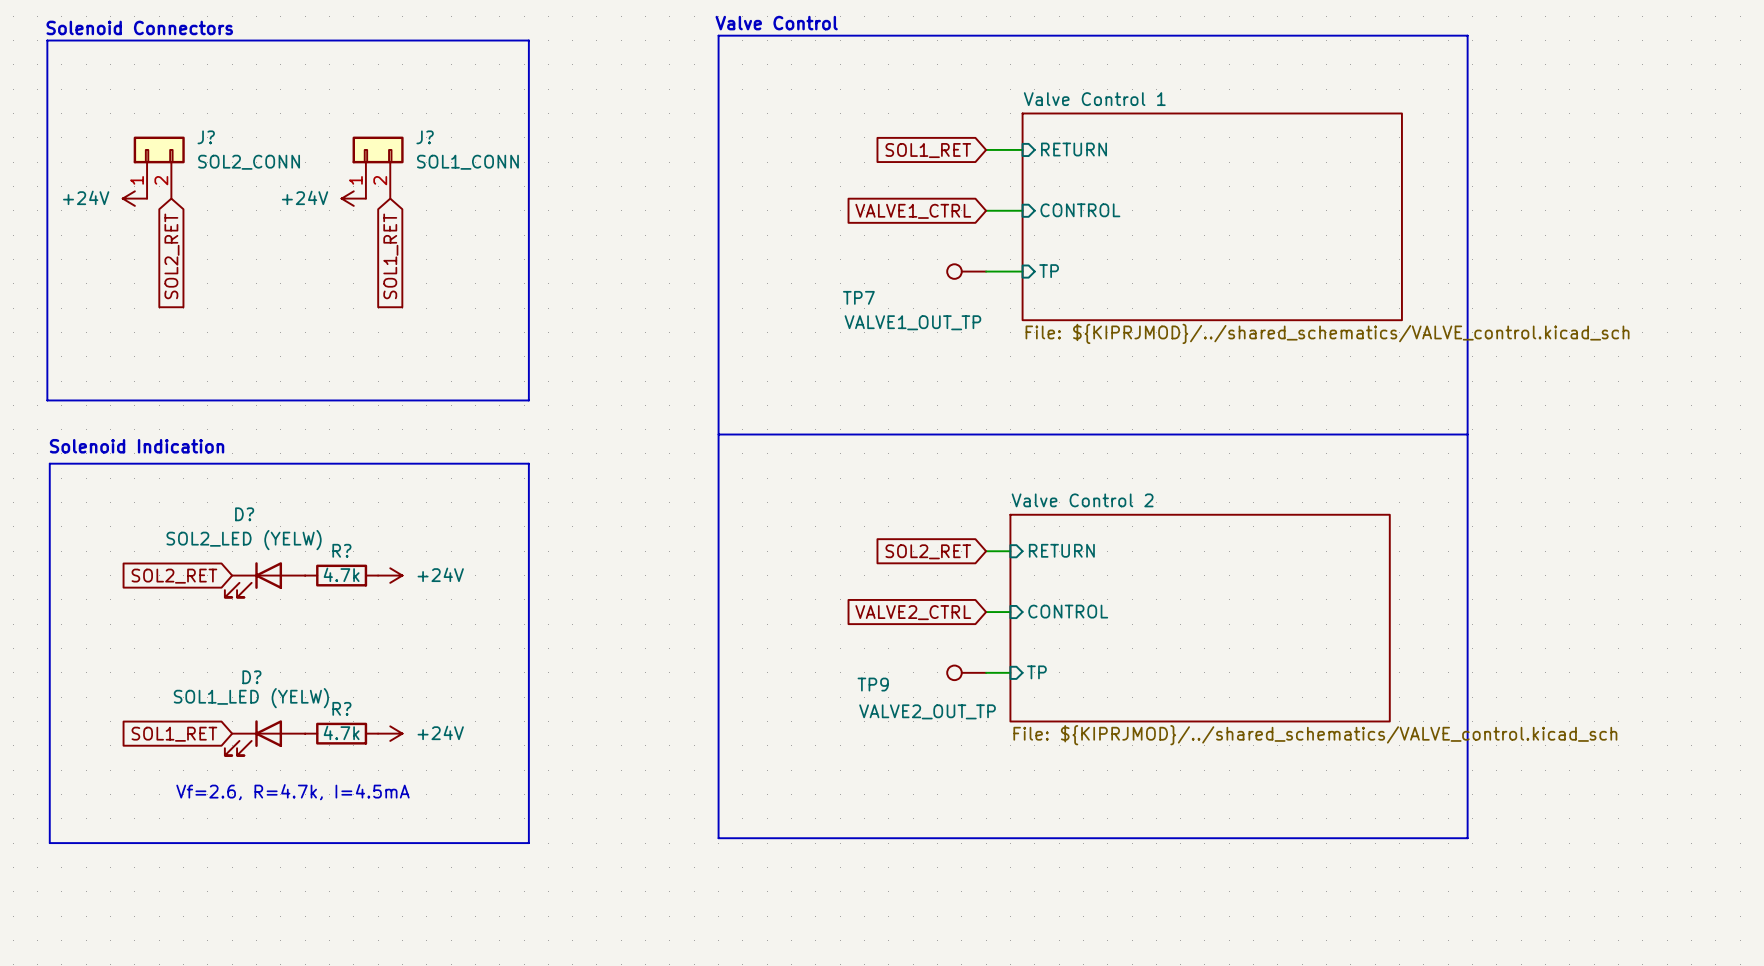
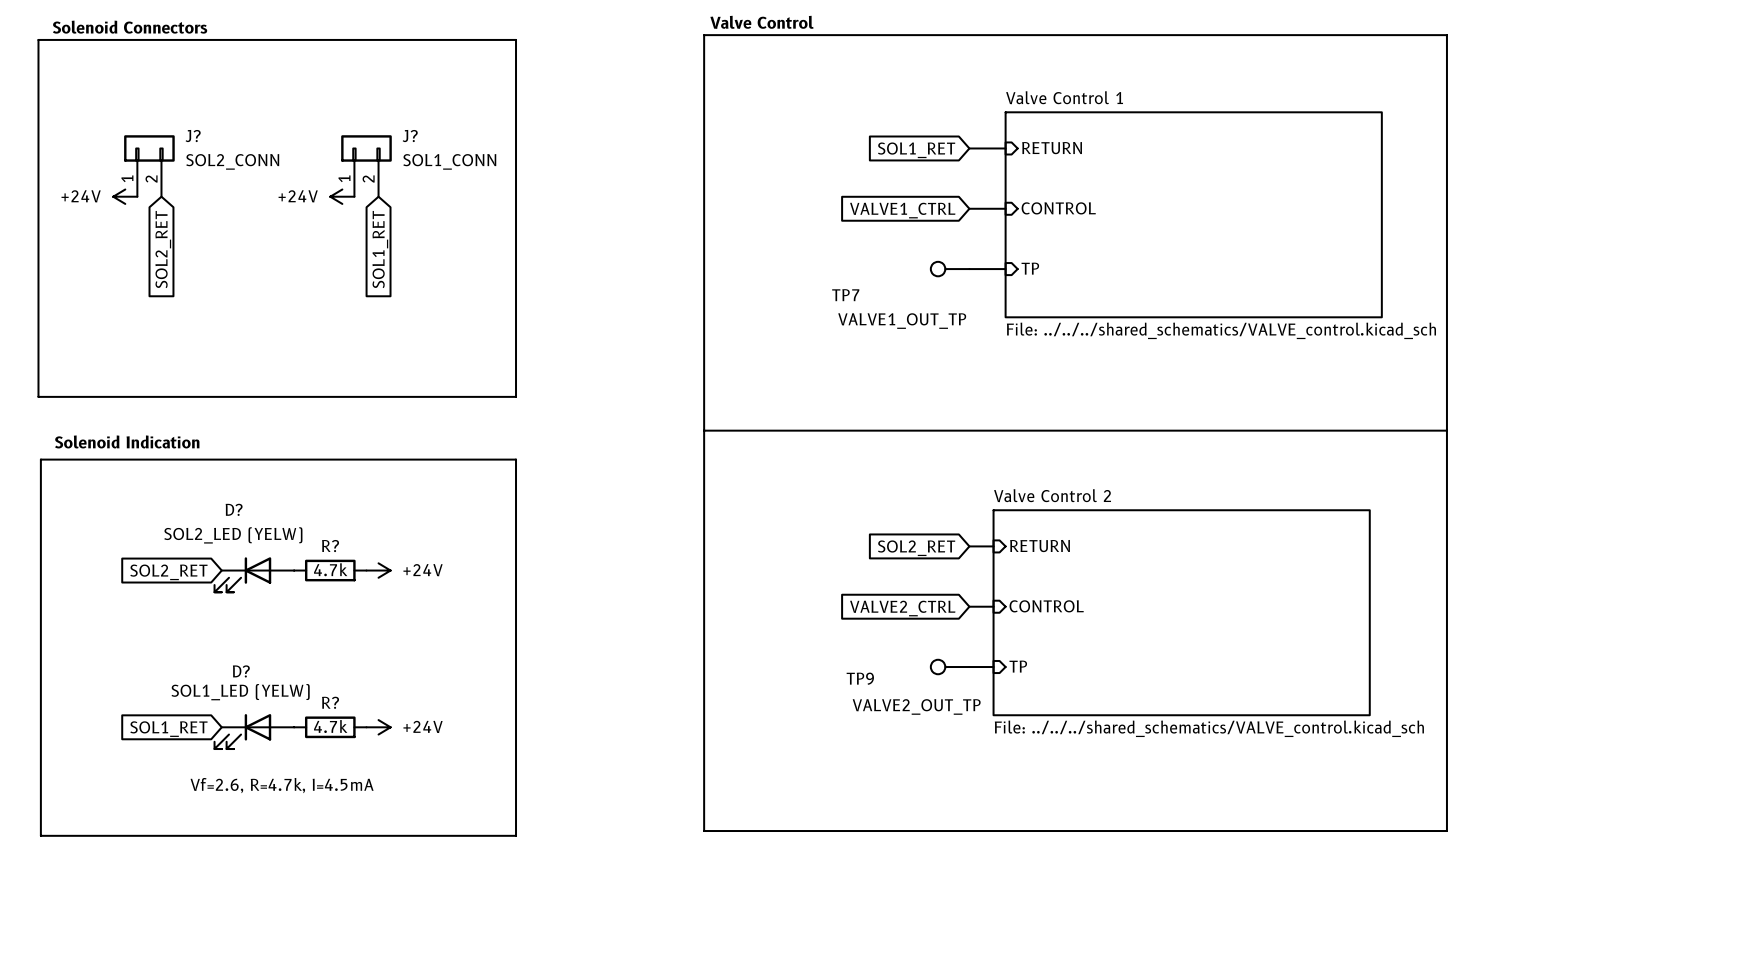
sheet Valve Control 1 value: File: ${KIPRJMOD}/../shared_schematics/VALVE_control.kicad_sch (1327, 333) -> File: ../../../shared_schematics/VALVE_control.kicad_sch (1221, 330)
sheet Valve Control 2 value: File: ${KIPRJMOD}/../shared_schematics/VALVE_control.kicad_sch (1315, 735) -> File: ../../../shared_schematics/VALVE_control.kicad_sch (1209, 728)

